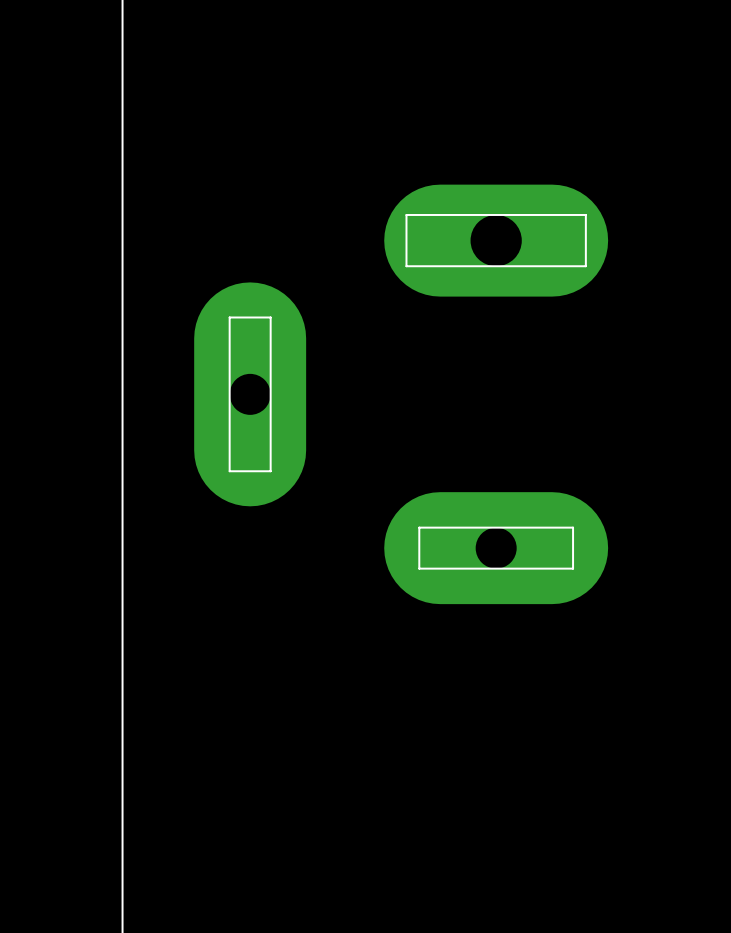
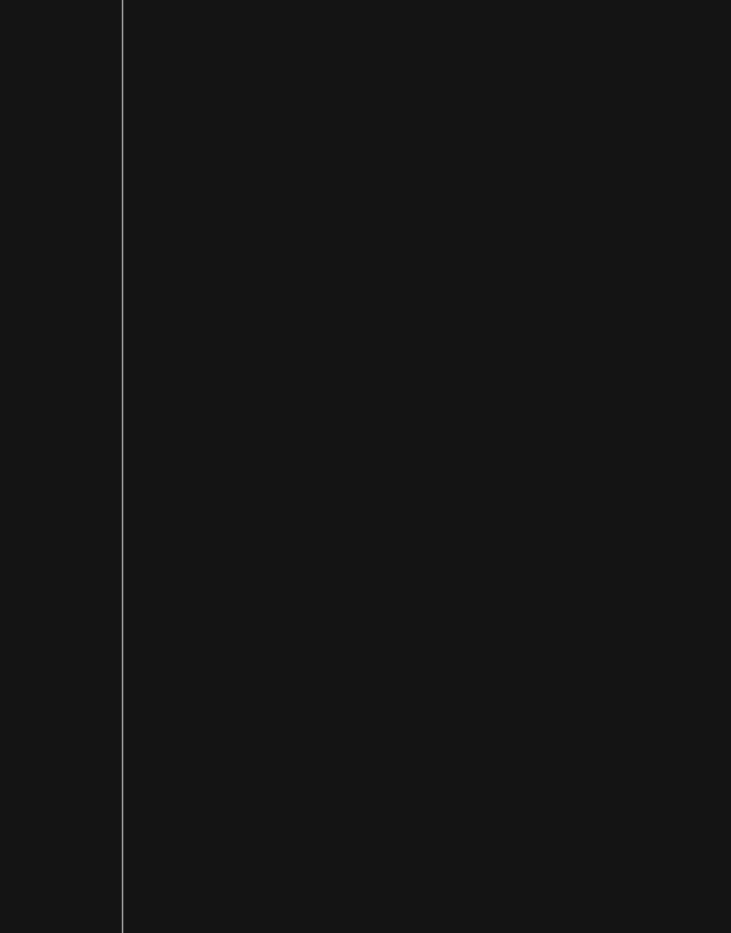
part: (401, 394) -> none

